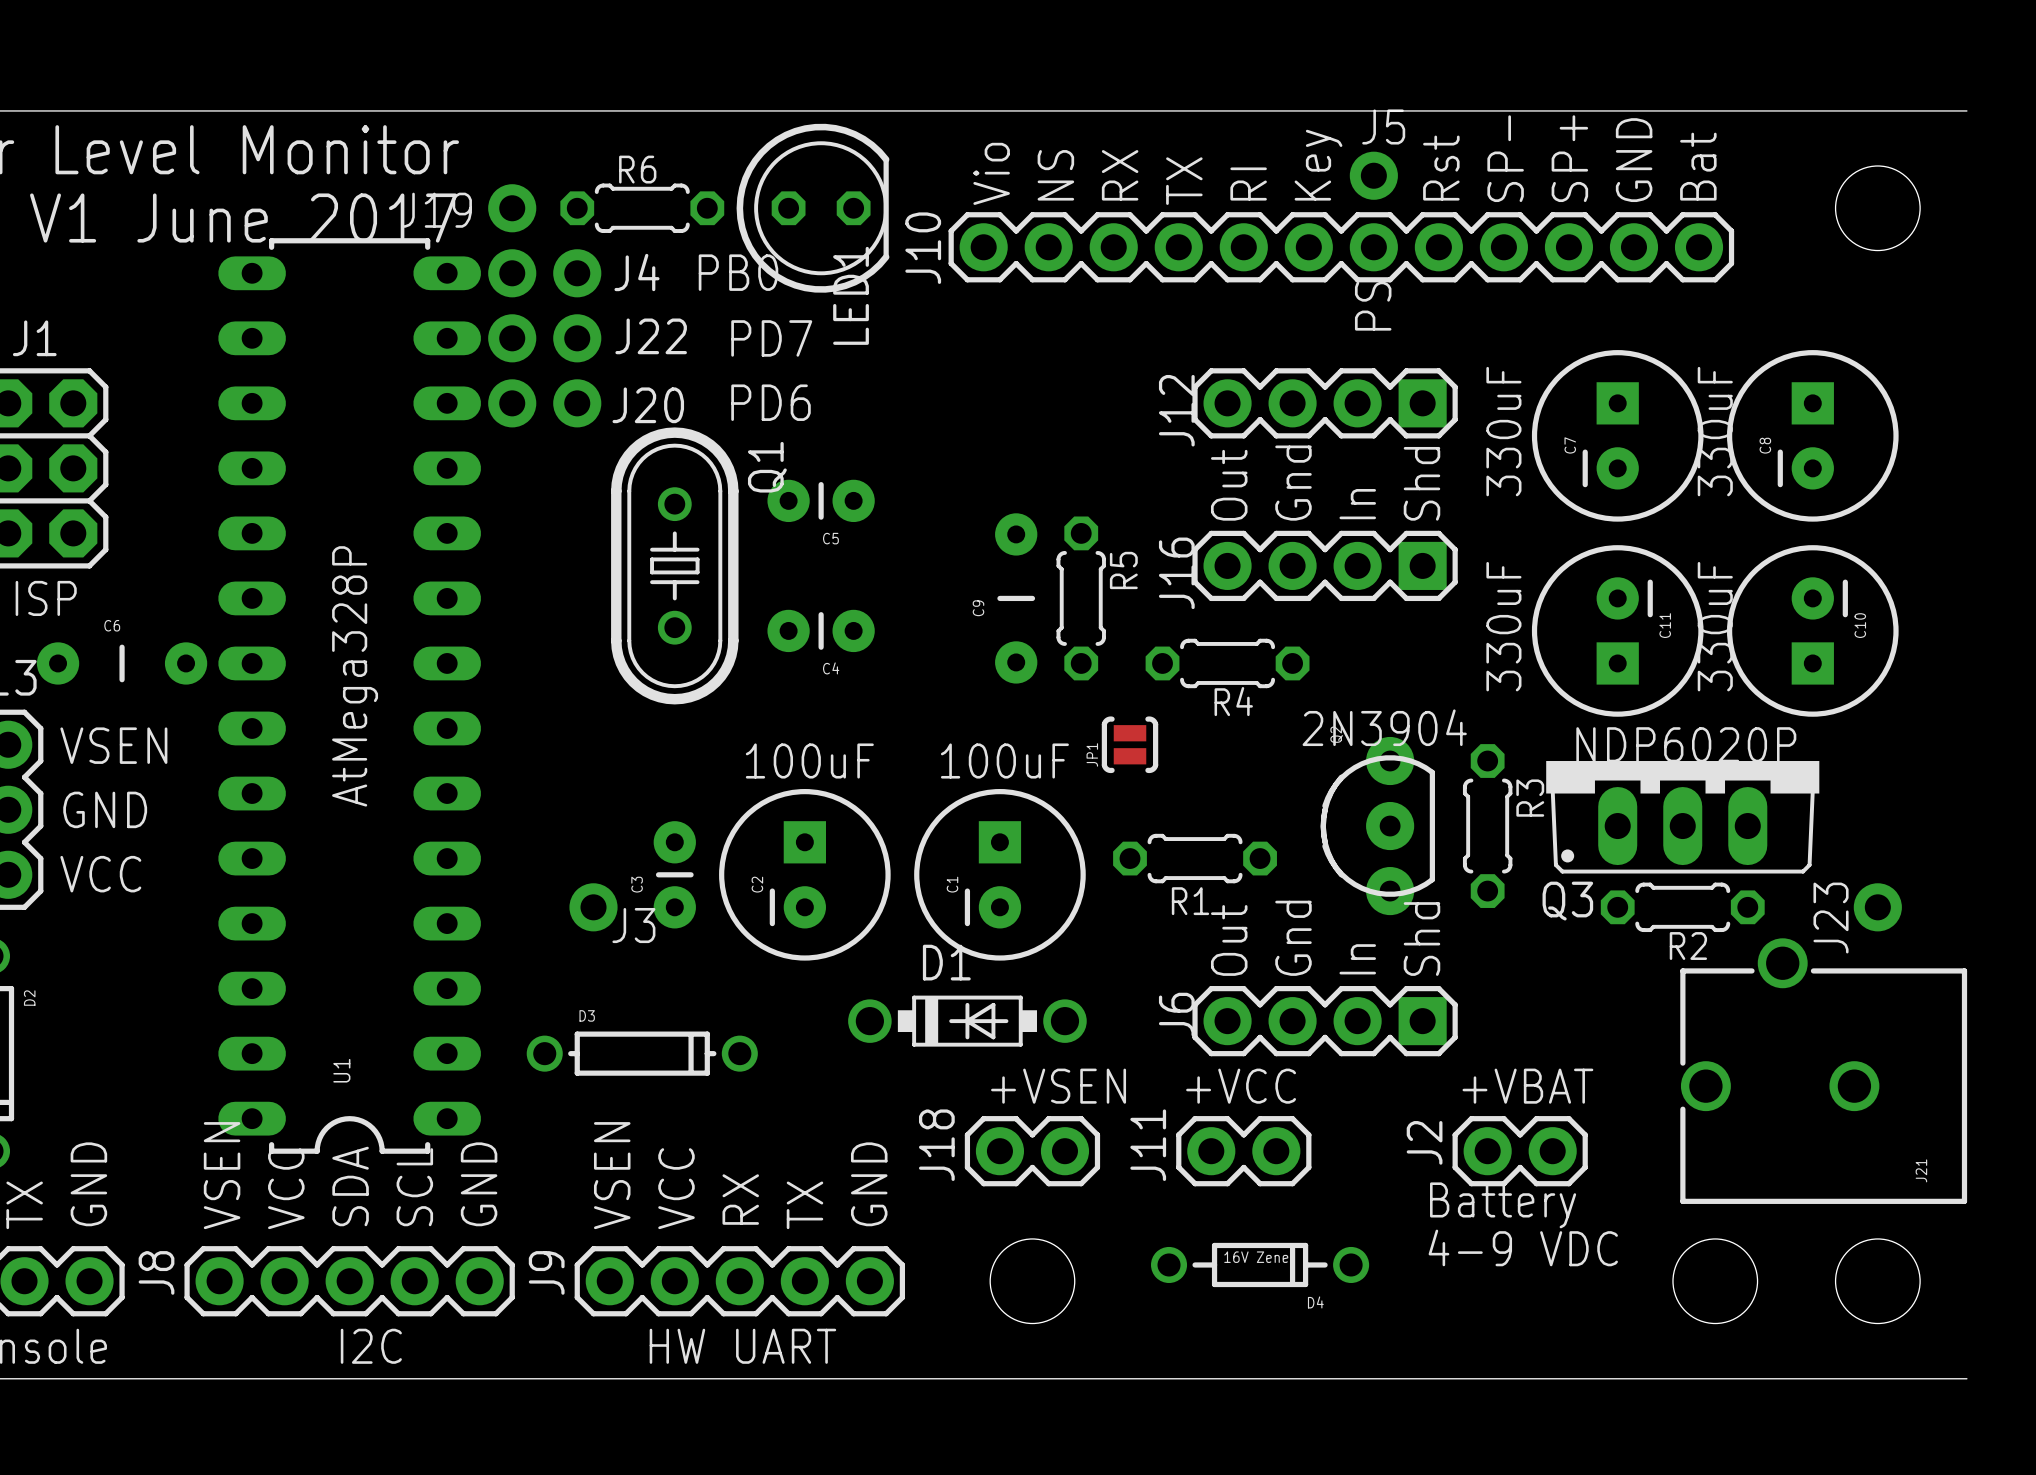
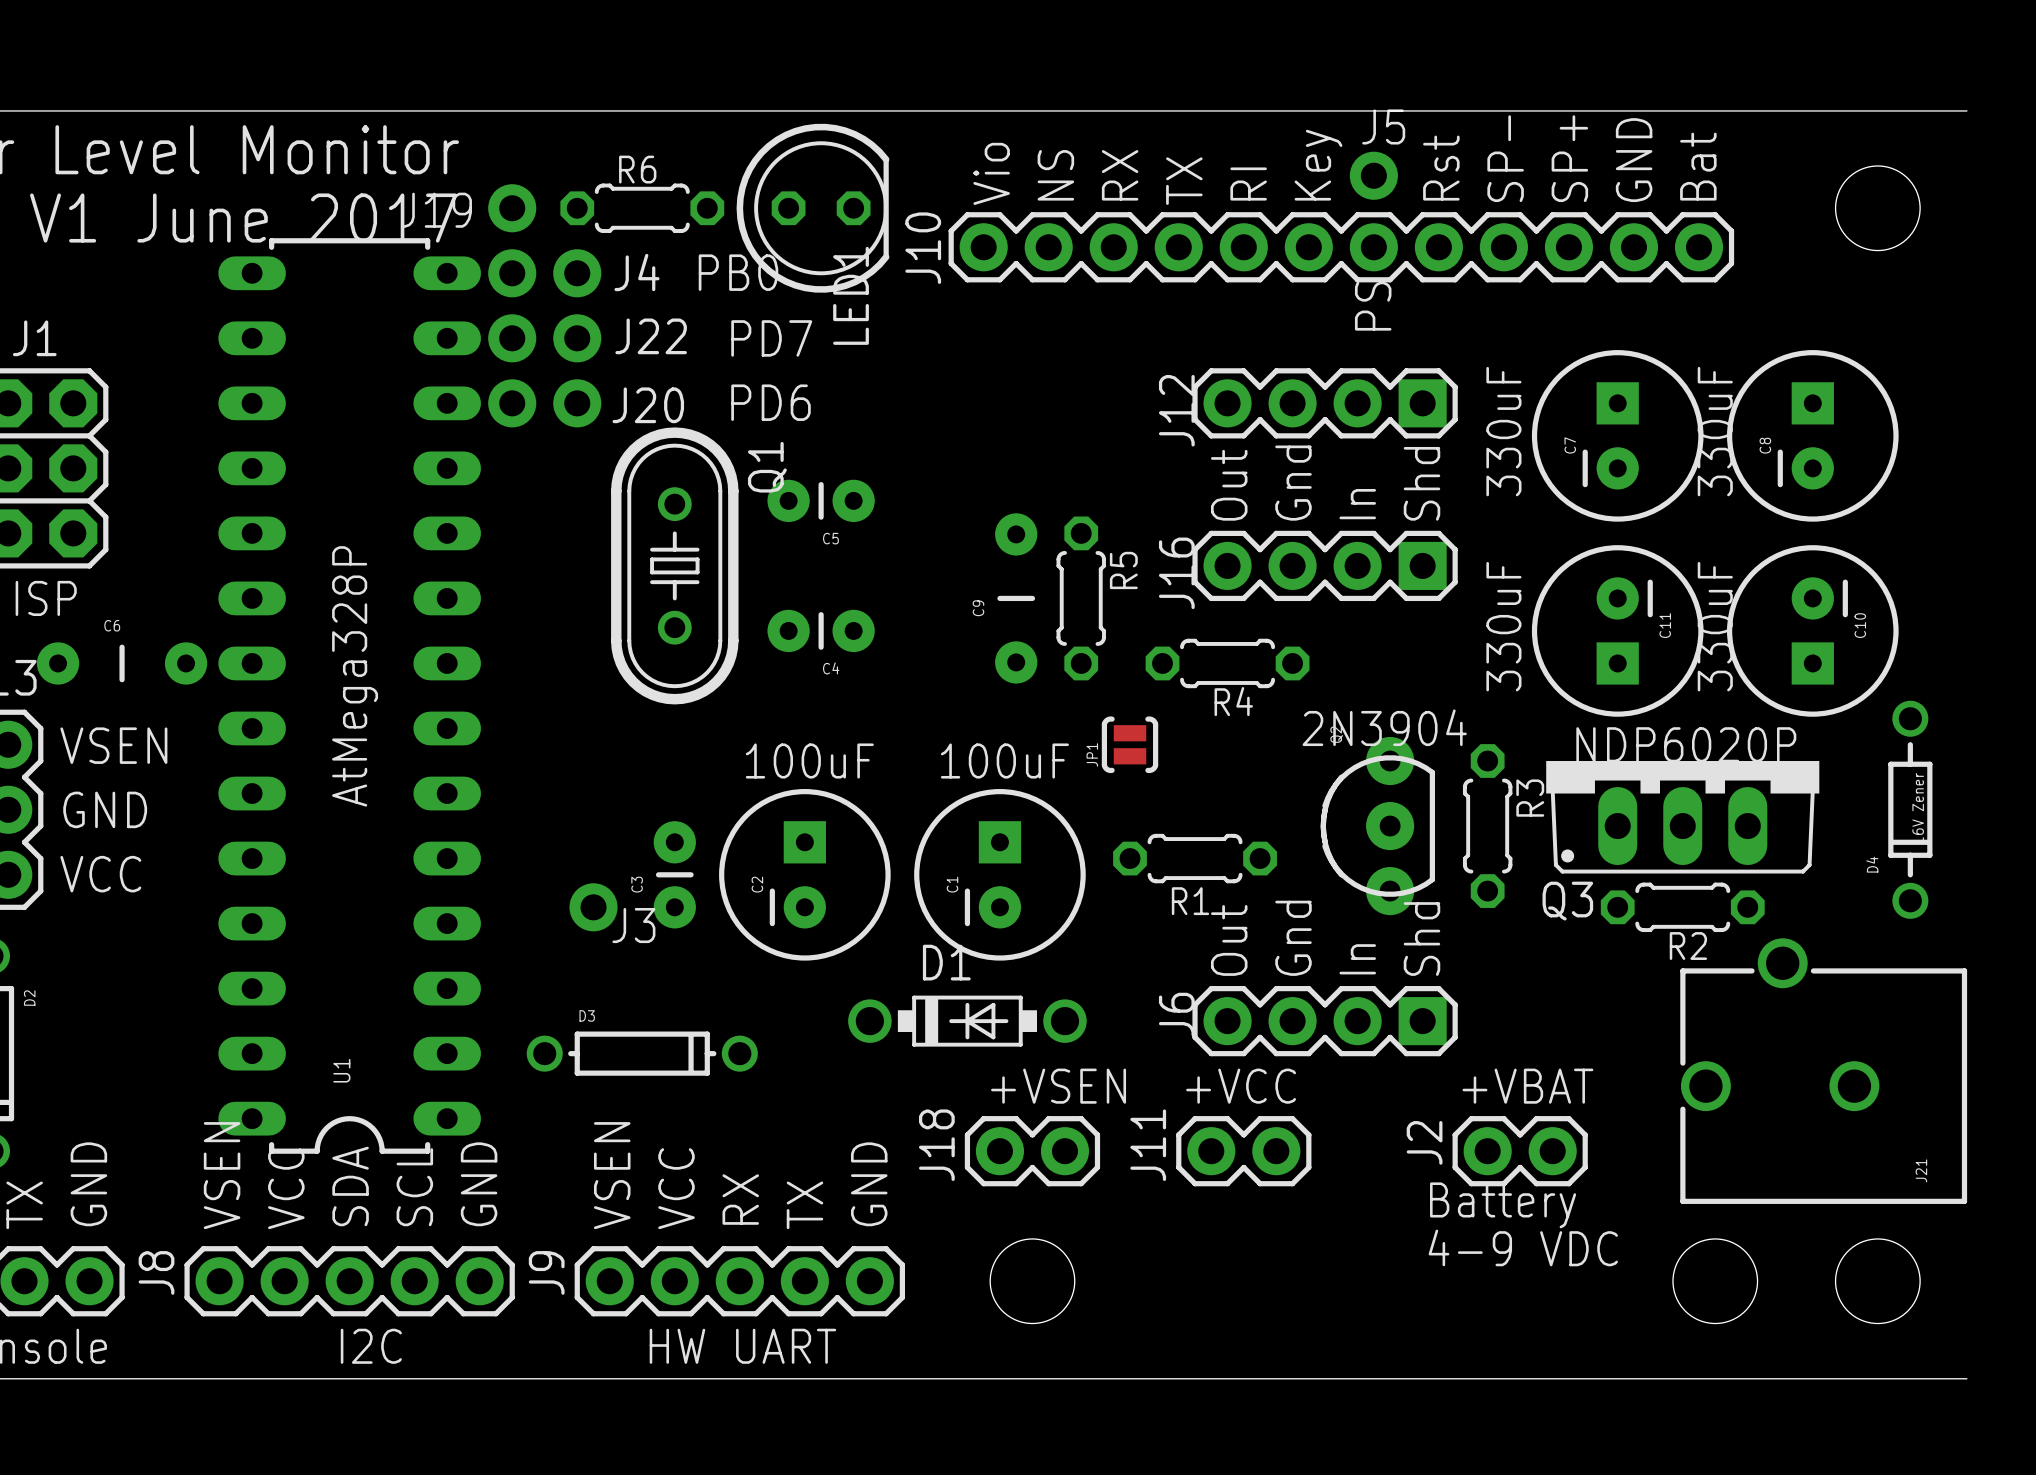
J23: (1877, 907) -> none
D4 rotation: 0° (1260, 1264) -> 90° clockwise (1910, 809)
D4 position: (1260, 1264) -> (1910, 809)

